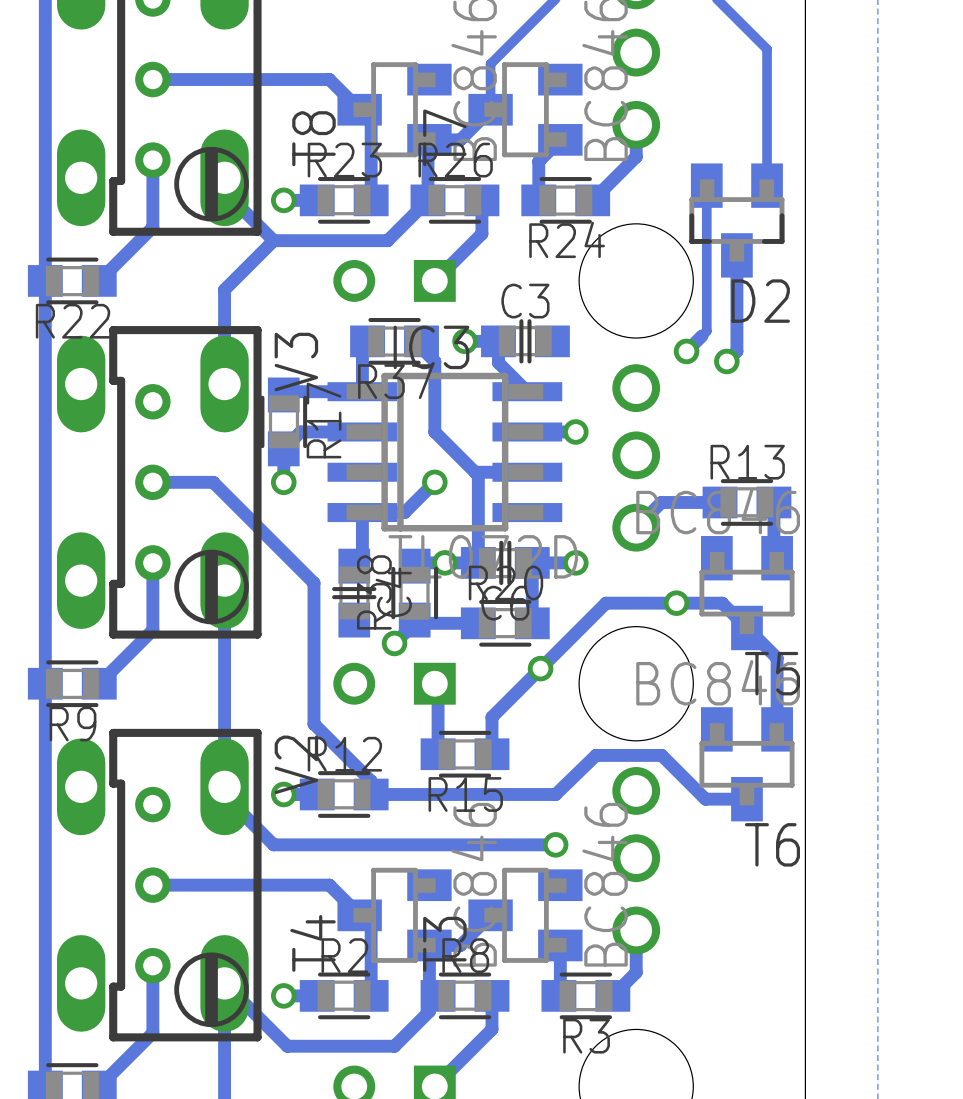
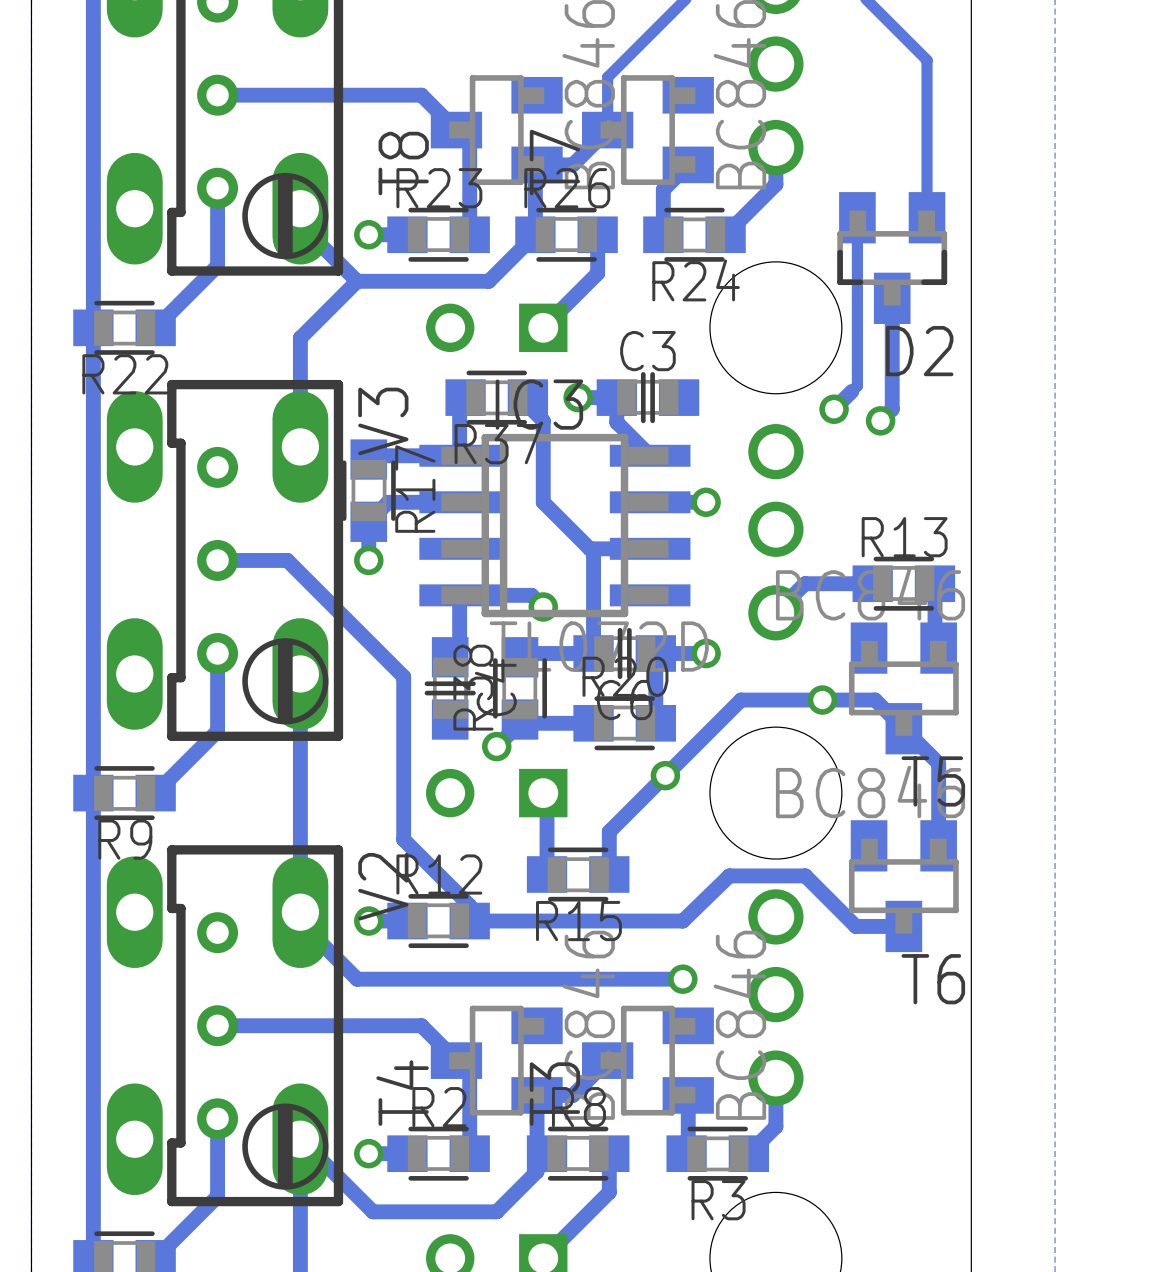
track: (434, 482) (404, 512) -> (543, 606) (531, 595) (508, 595)
via: (434, 482) -> none
via: none -> (543, 606)
via: (444, 562) -> none

